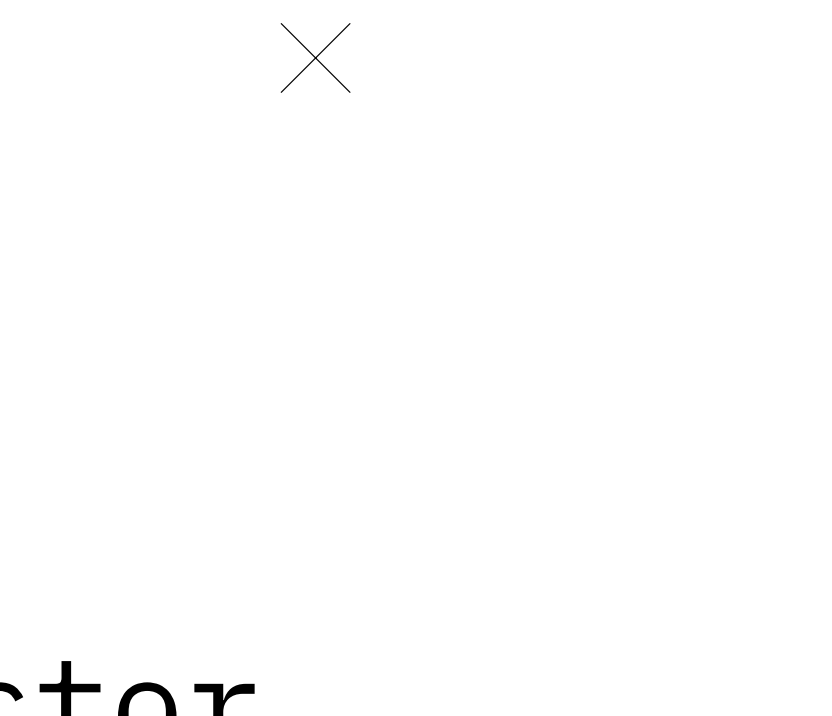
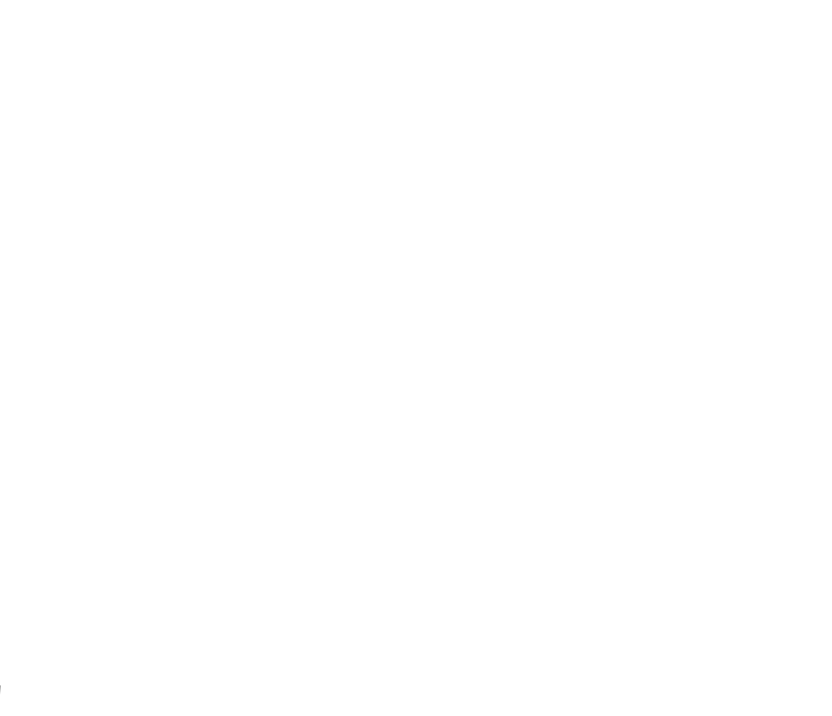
no-connect mark: (315, 57) -> none

